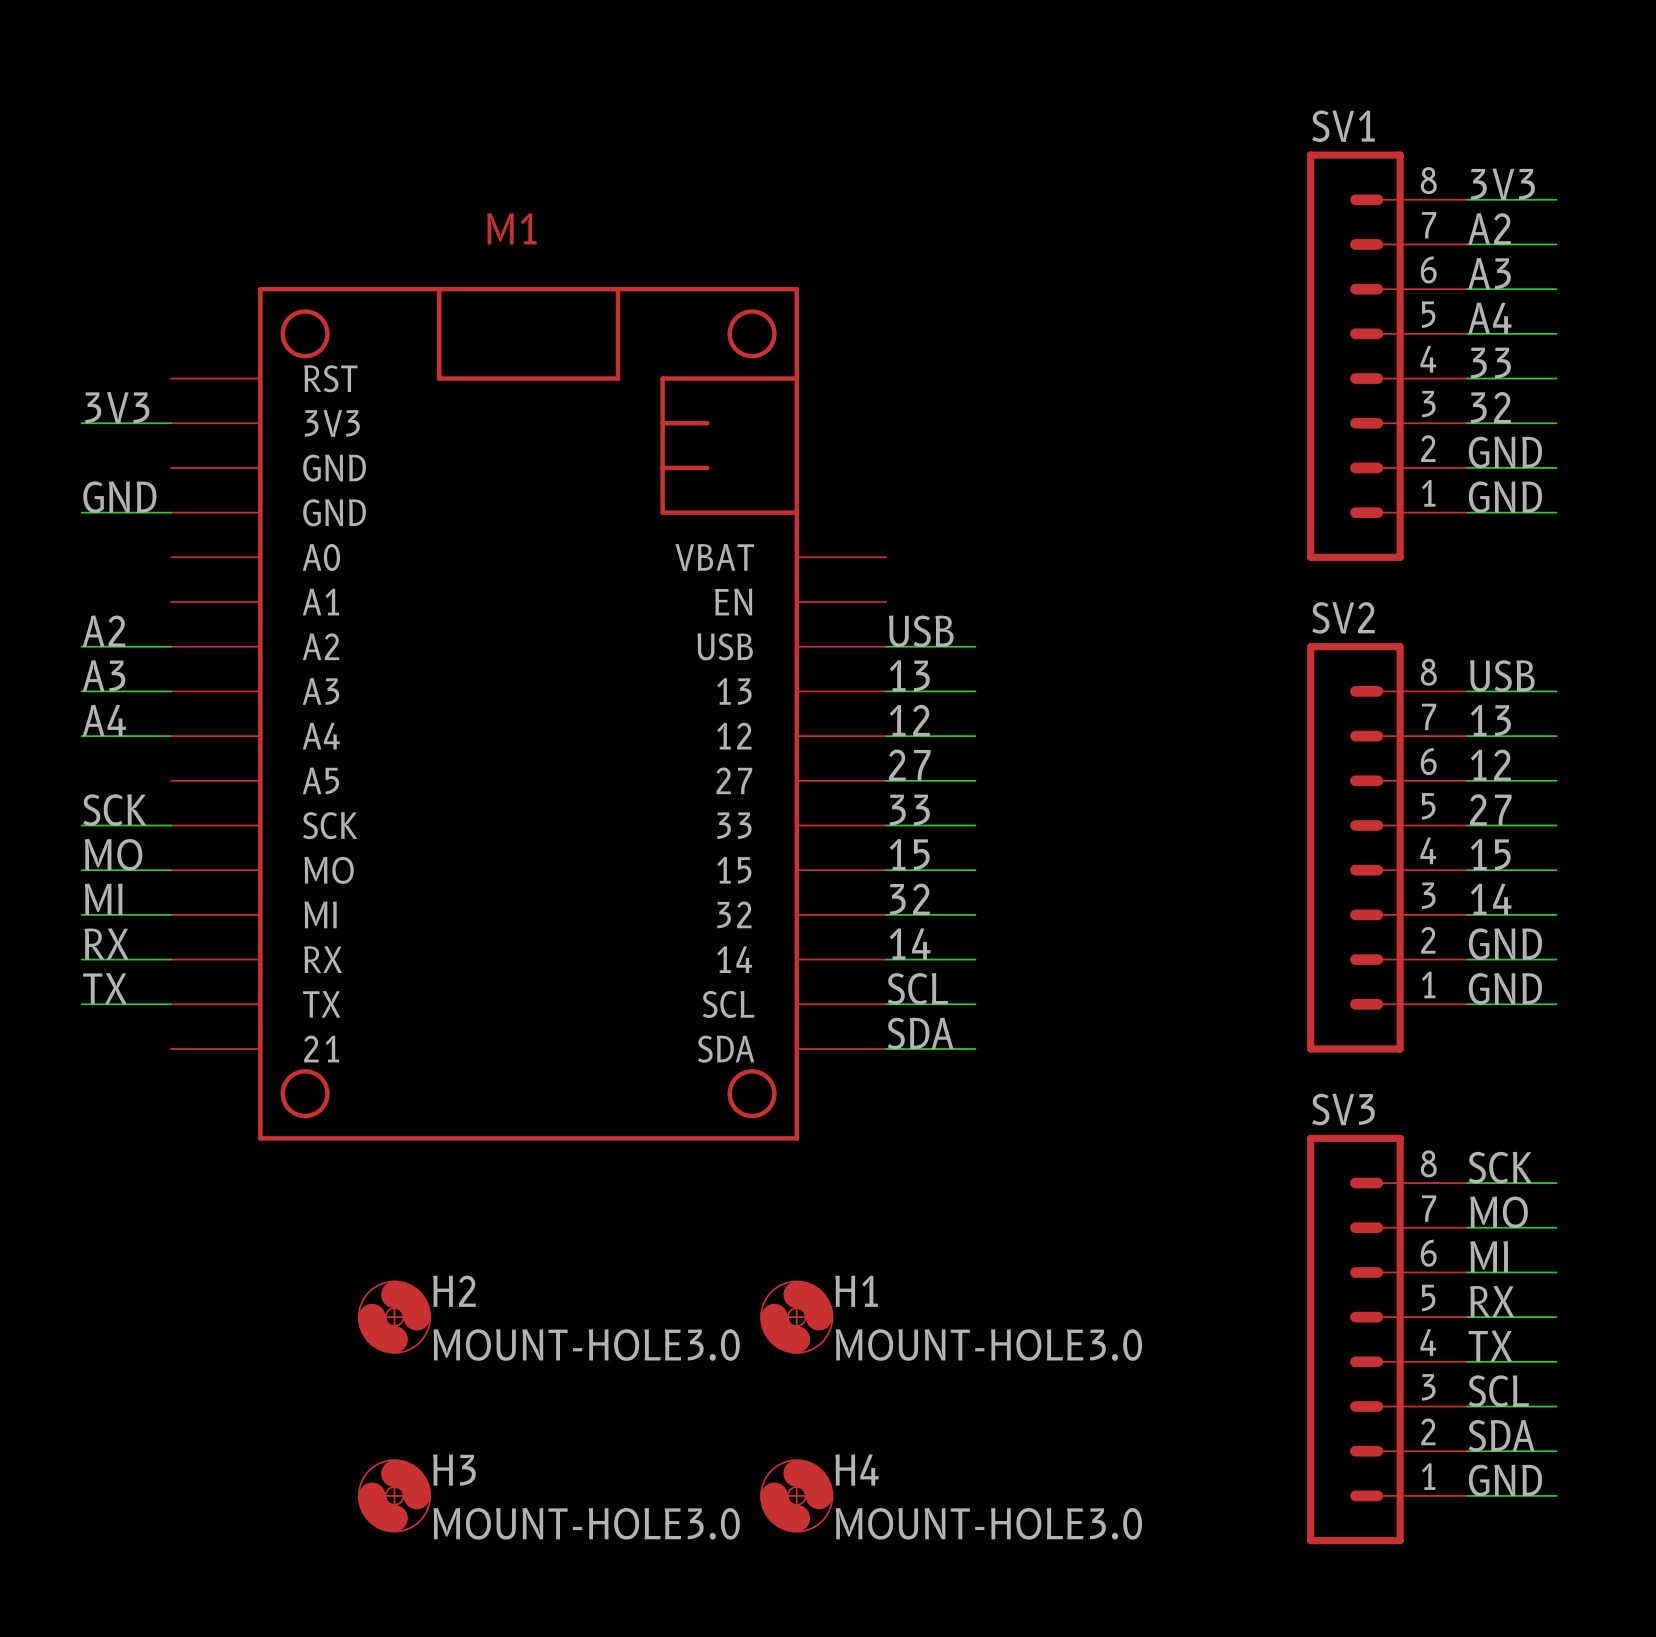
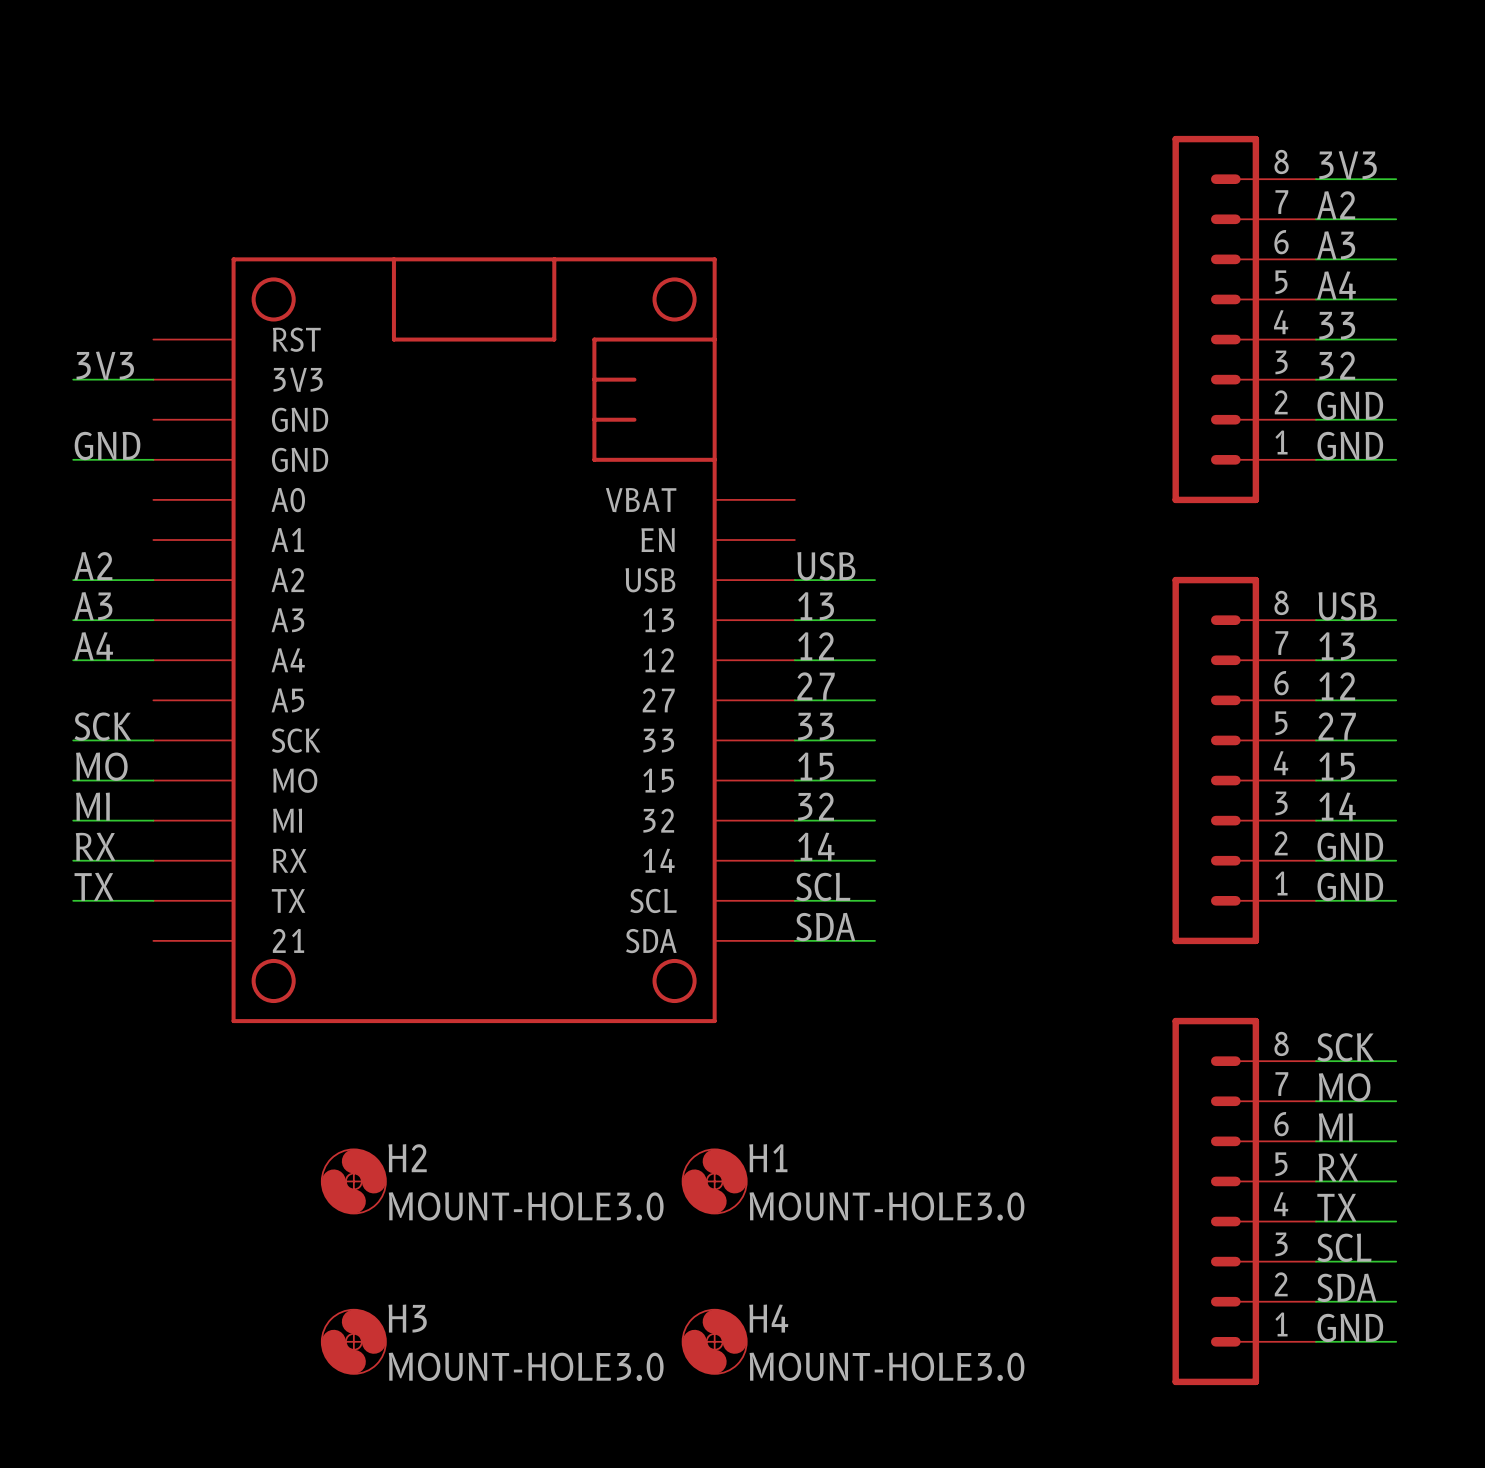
SV1 name: SV1 (1343, 126) -> none
M1 name: M1 (511, 228) -> none
SV2 name: SV2 (1343, 617) -> none
SV3 name: SV3 (1343, 1109) -> none

